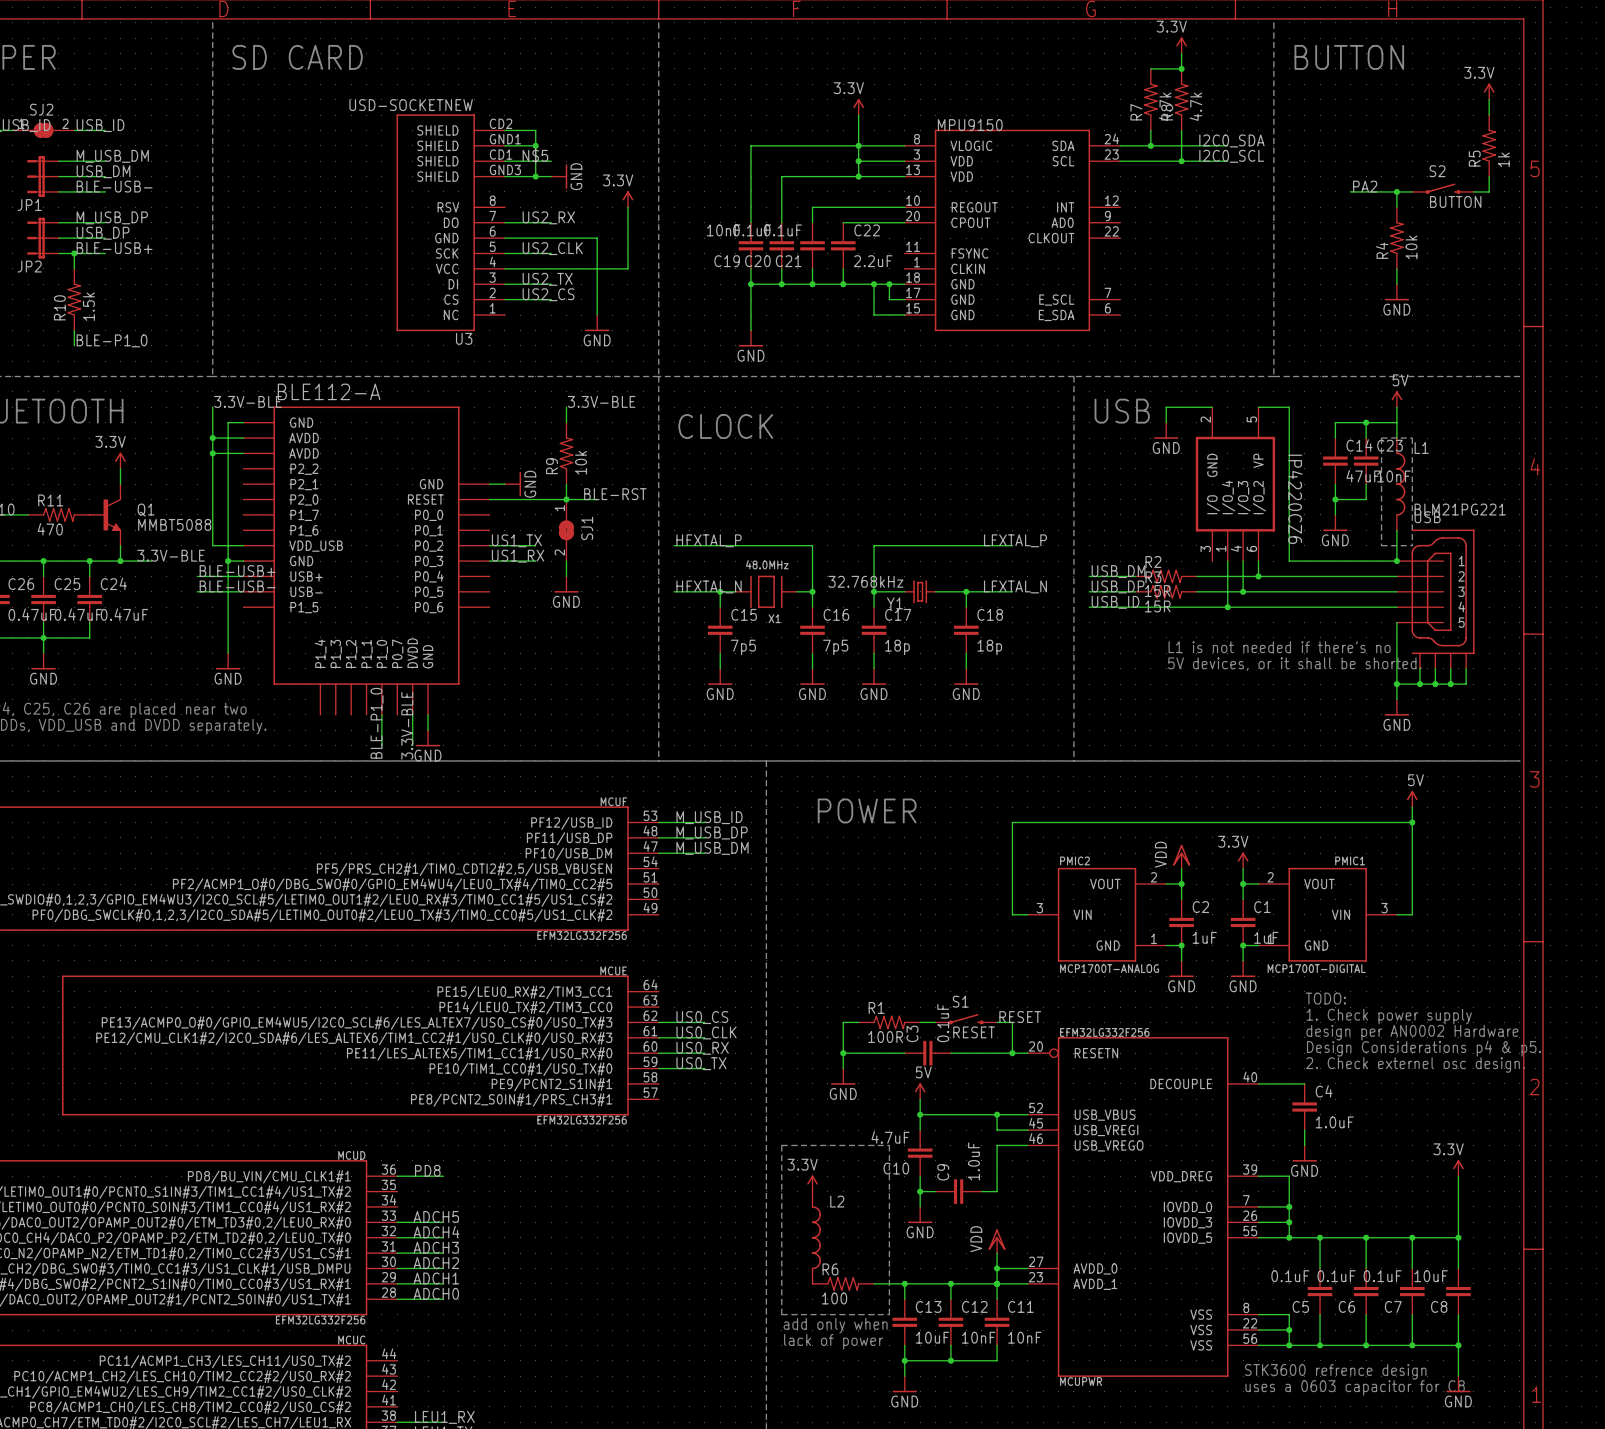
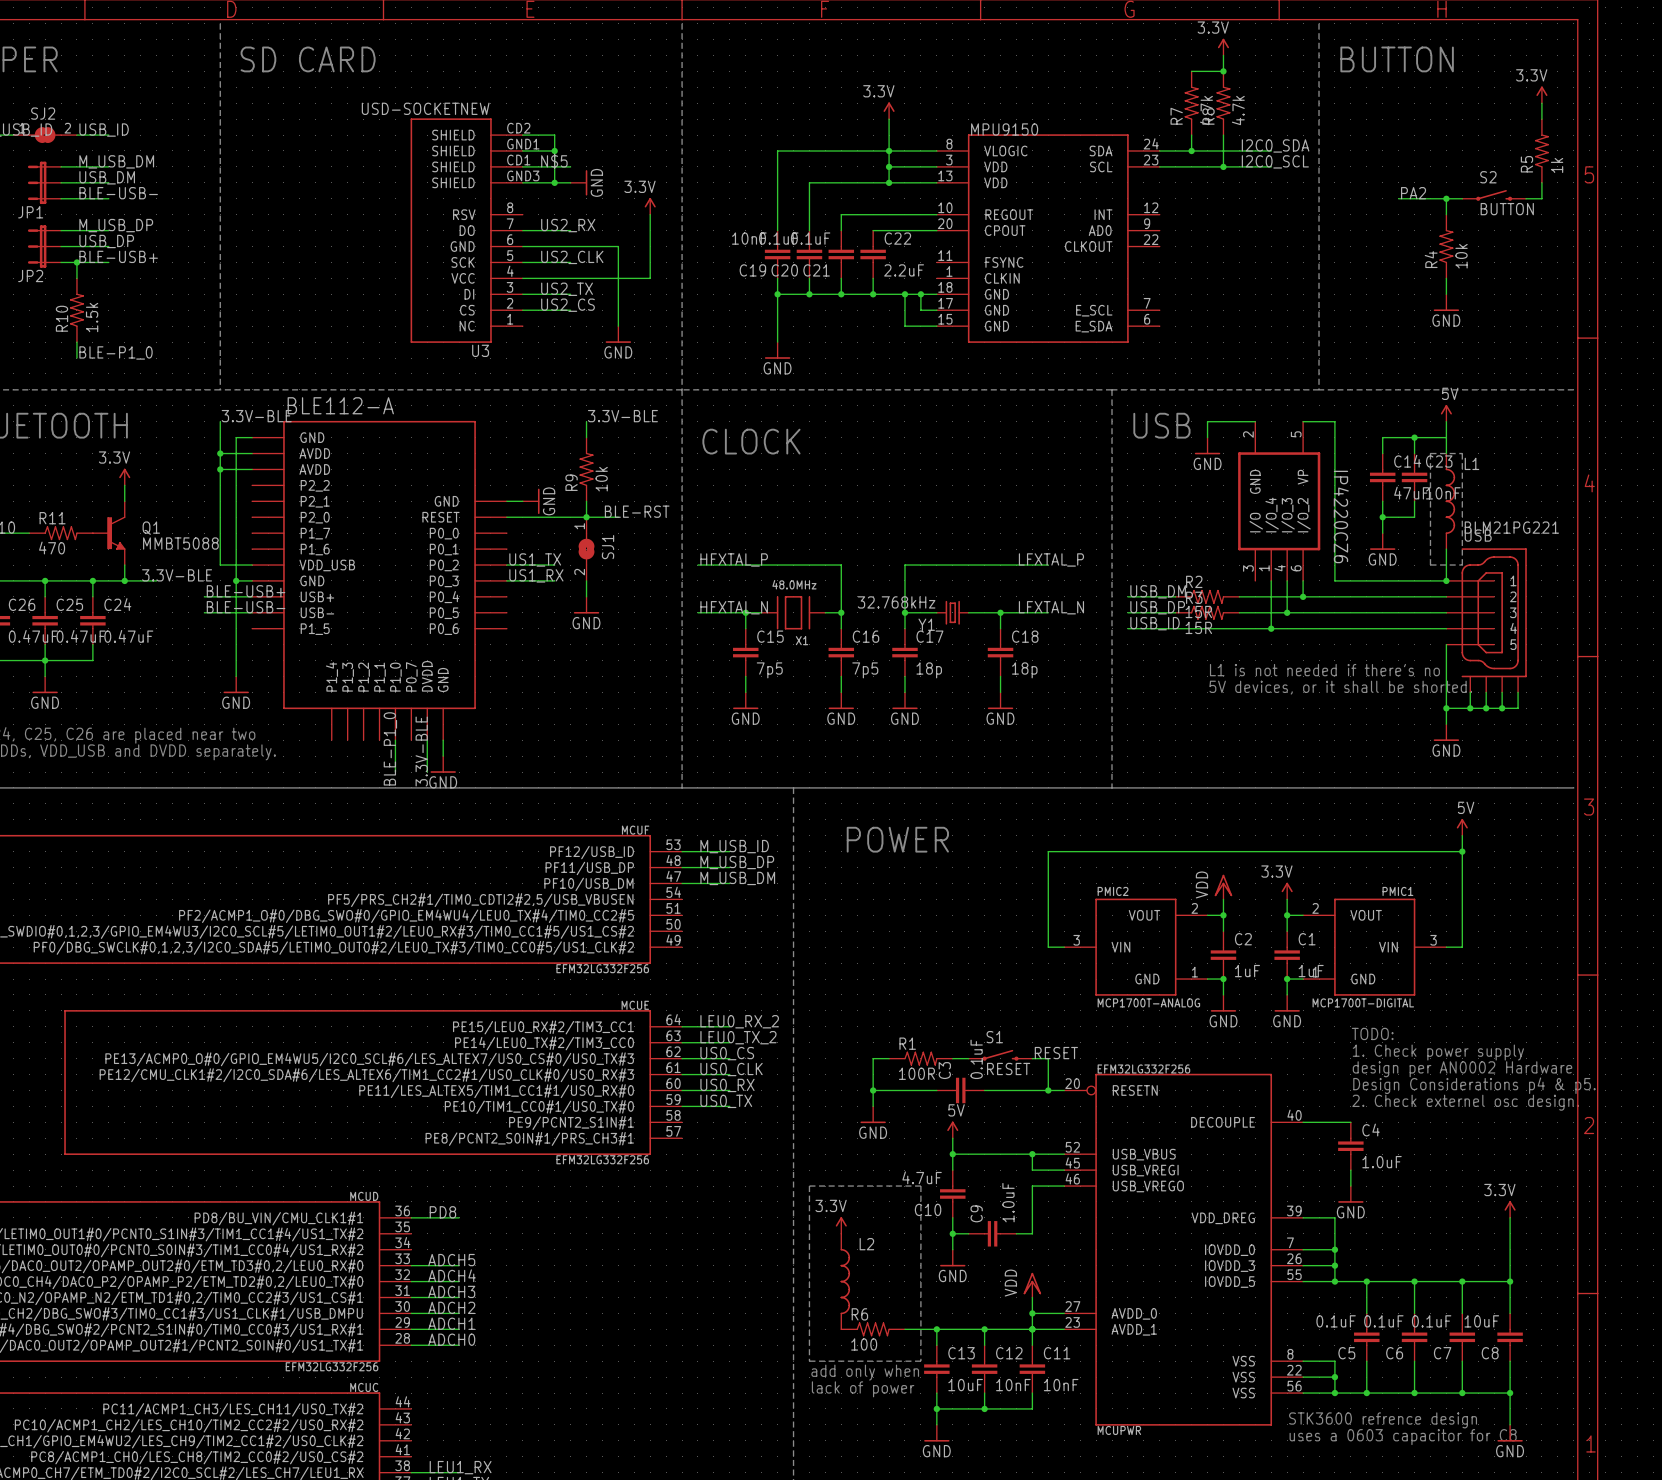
label: none -> LEU0_RX_2 (739, 1021)
wire: none -> (682, 1026) (729, 1026)
label: none -> LEU0_TX_2 (738, 1037)
wire: none -> (682, 1042) (729, 1042)

